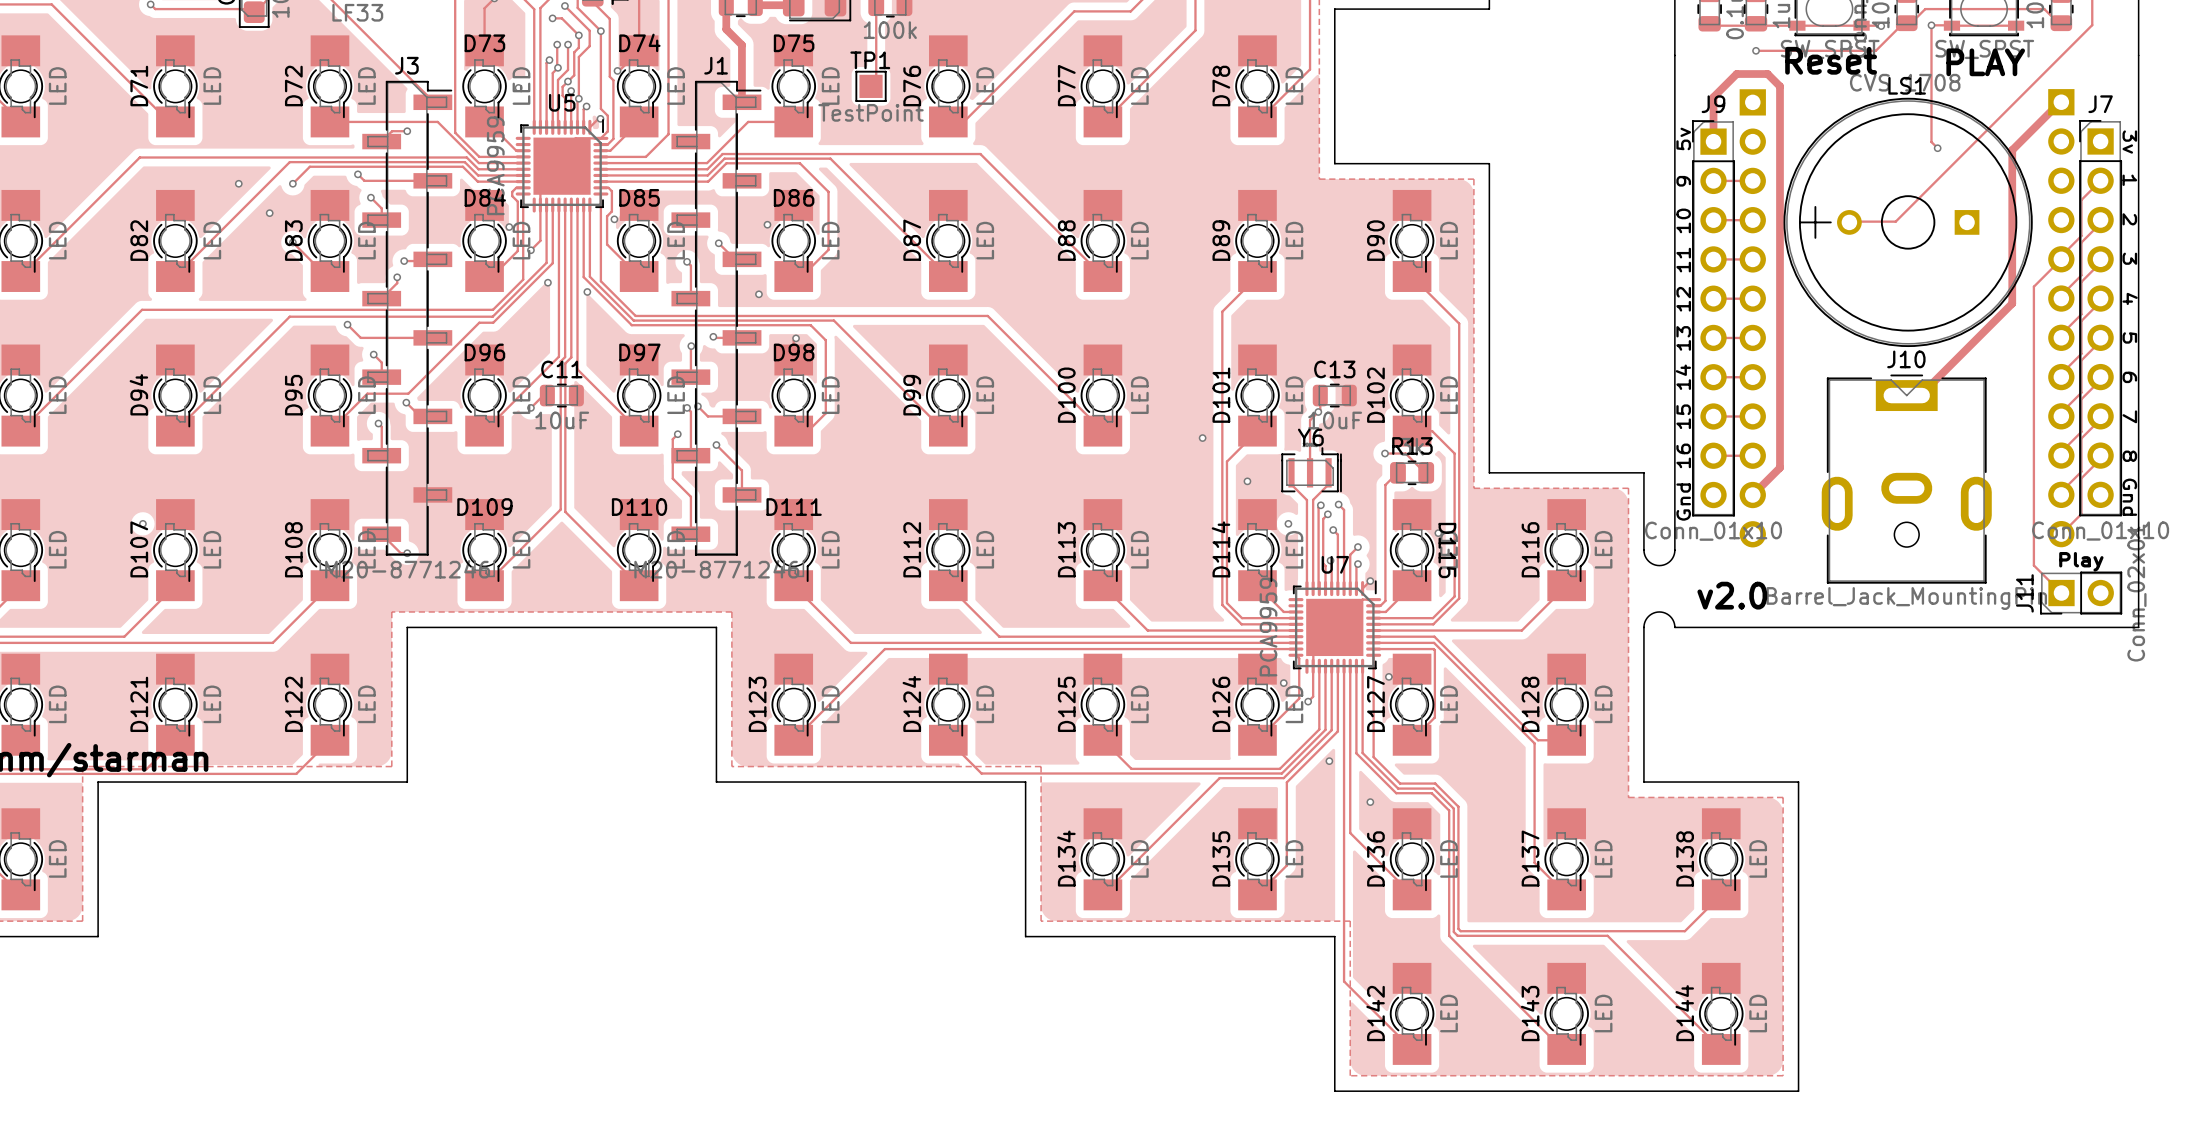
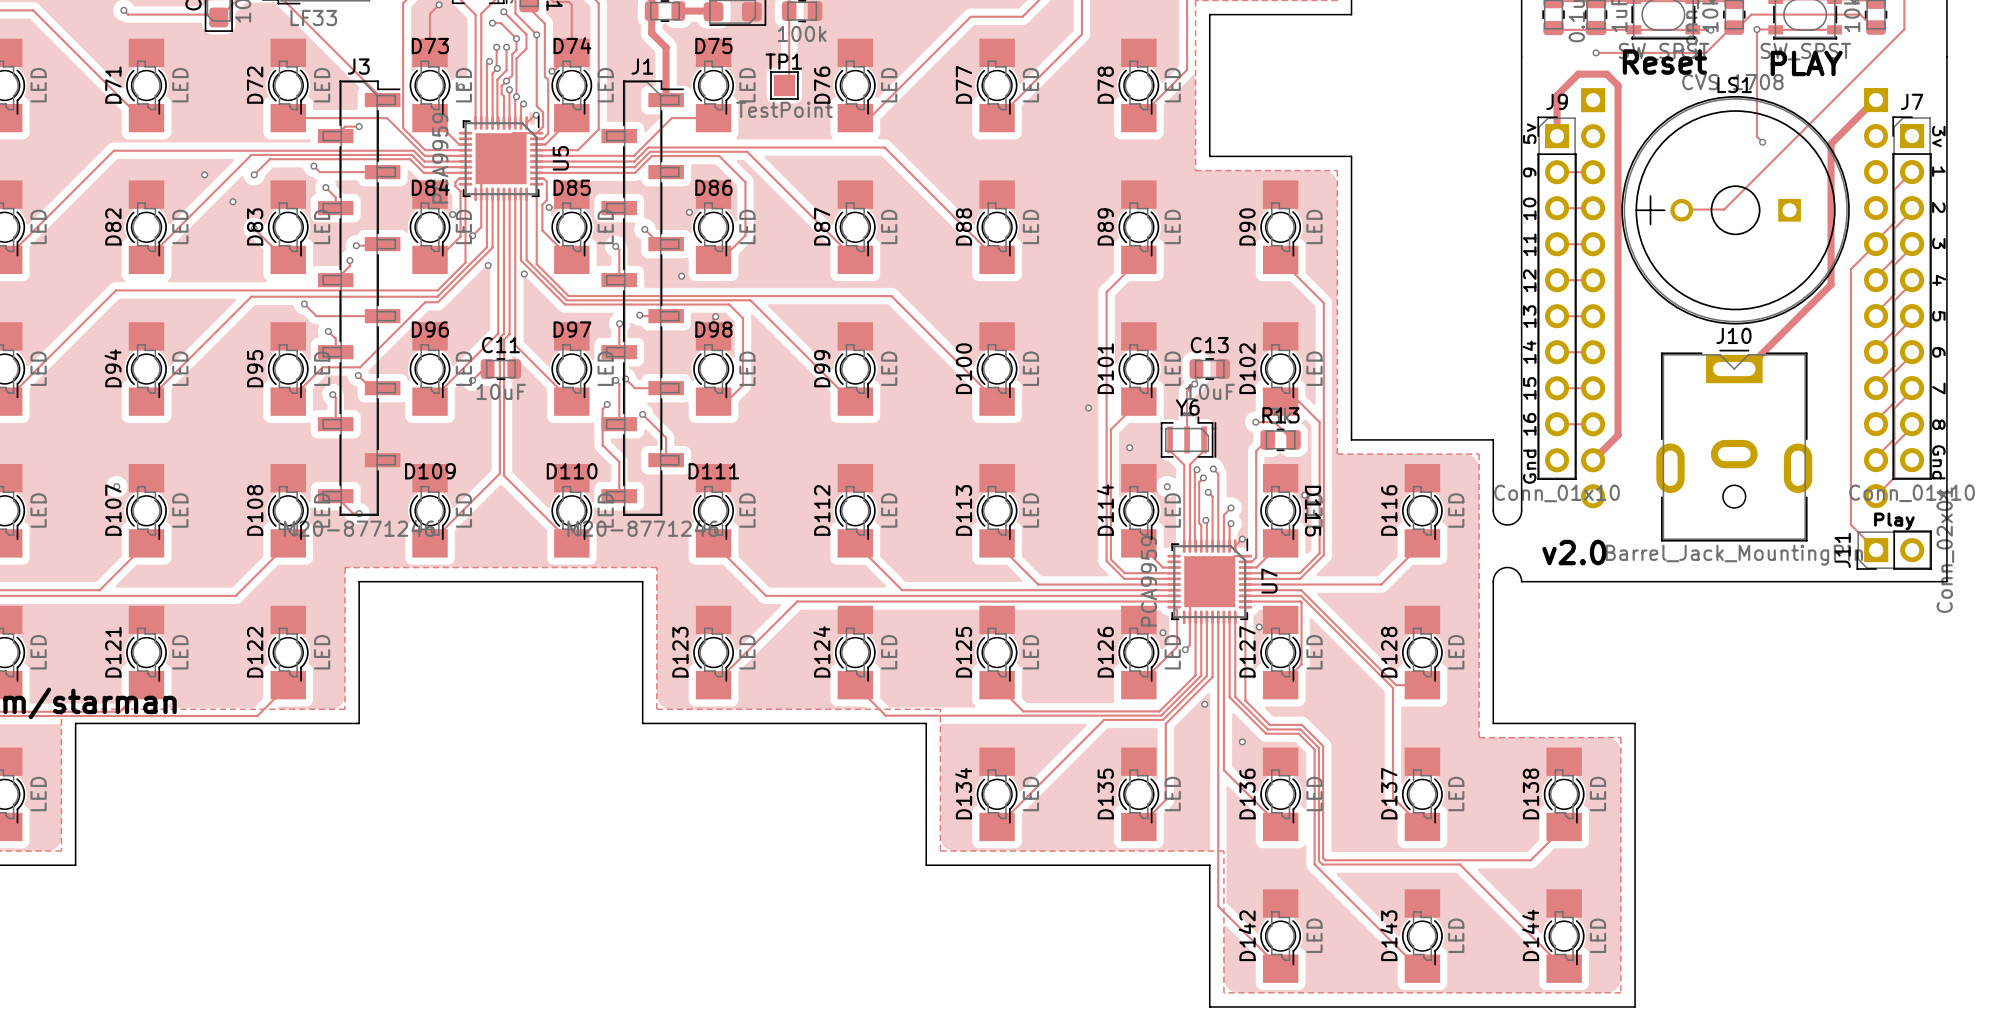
U5 name position: U5 (562, 102) -> U5 (560, 158)
U5 footprint: [515, 119, 609, 213] -> [458, 115, 544, 202]
U7 name position: U7 (1335, 564) -> U7 (1269, 581)
U7 footprint: [1288, 580, 1382, 674] -> [1167, 538, 1253, 625]

